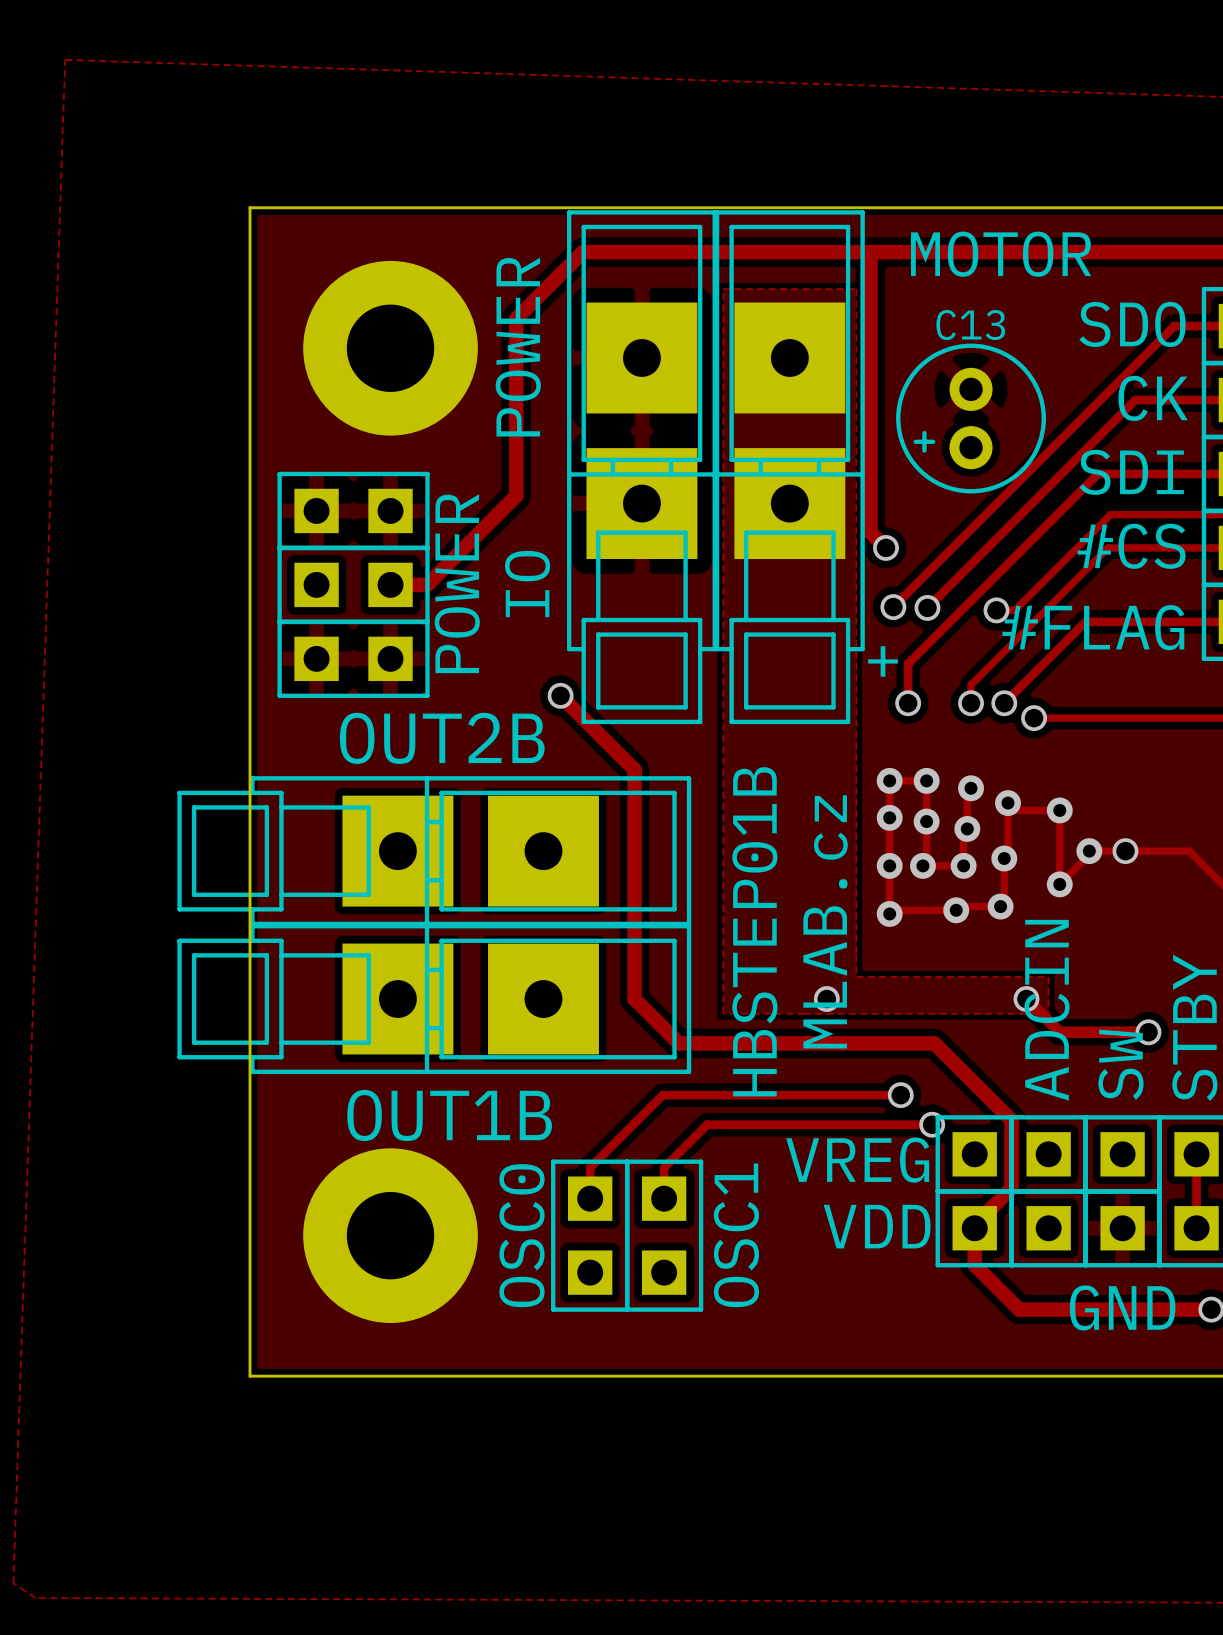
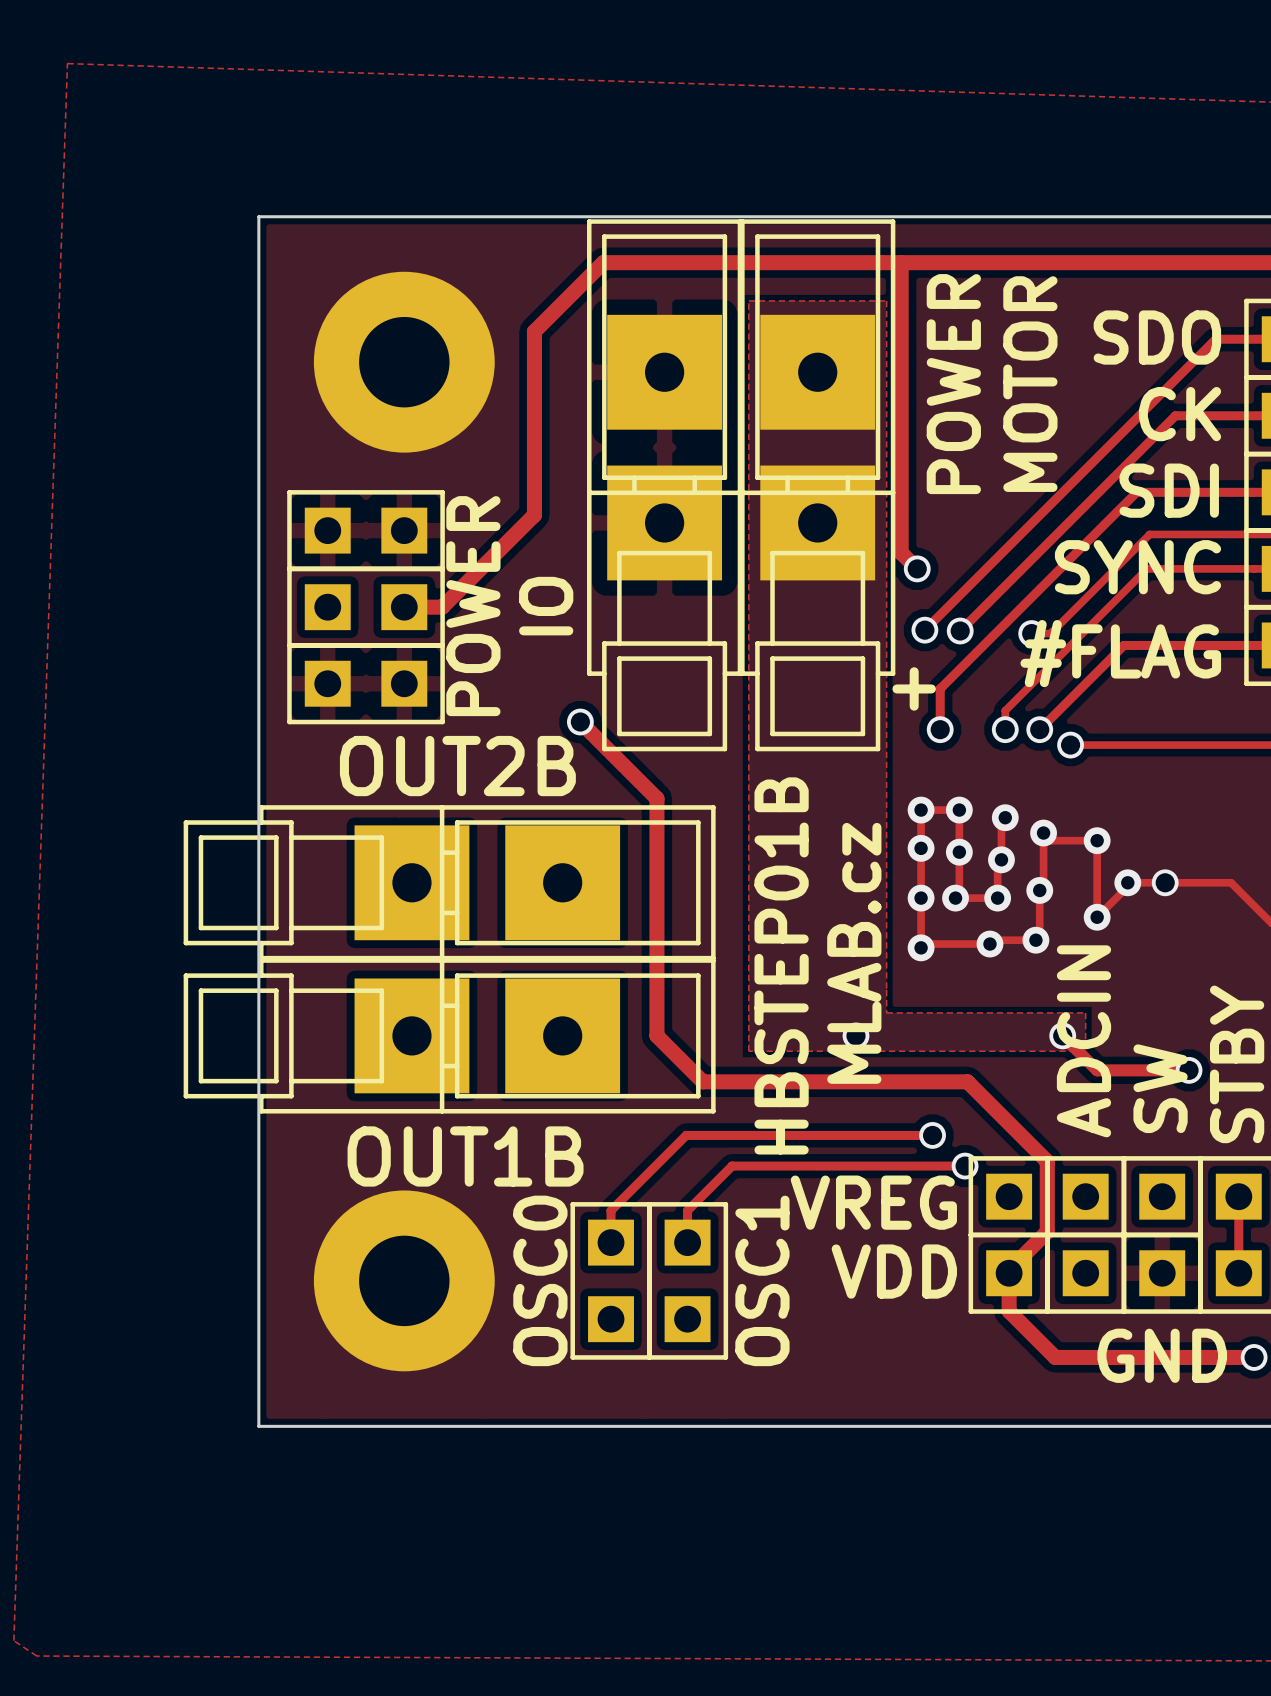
text rotation: 0° (1001, 254) -> 90° counterclockwise (1030, 384)
text position: POWER (518, 347) -> POWER (953, 384)
C13: (971, 418) -> none
text: #CS (1131, 546) -> SYNC (1138, 567)

